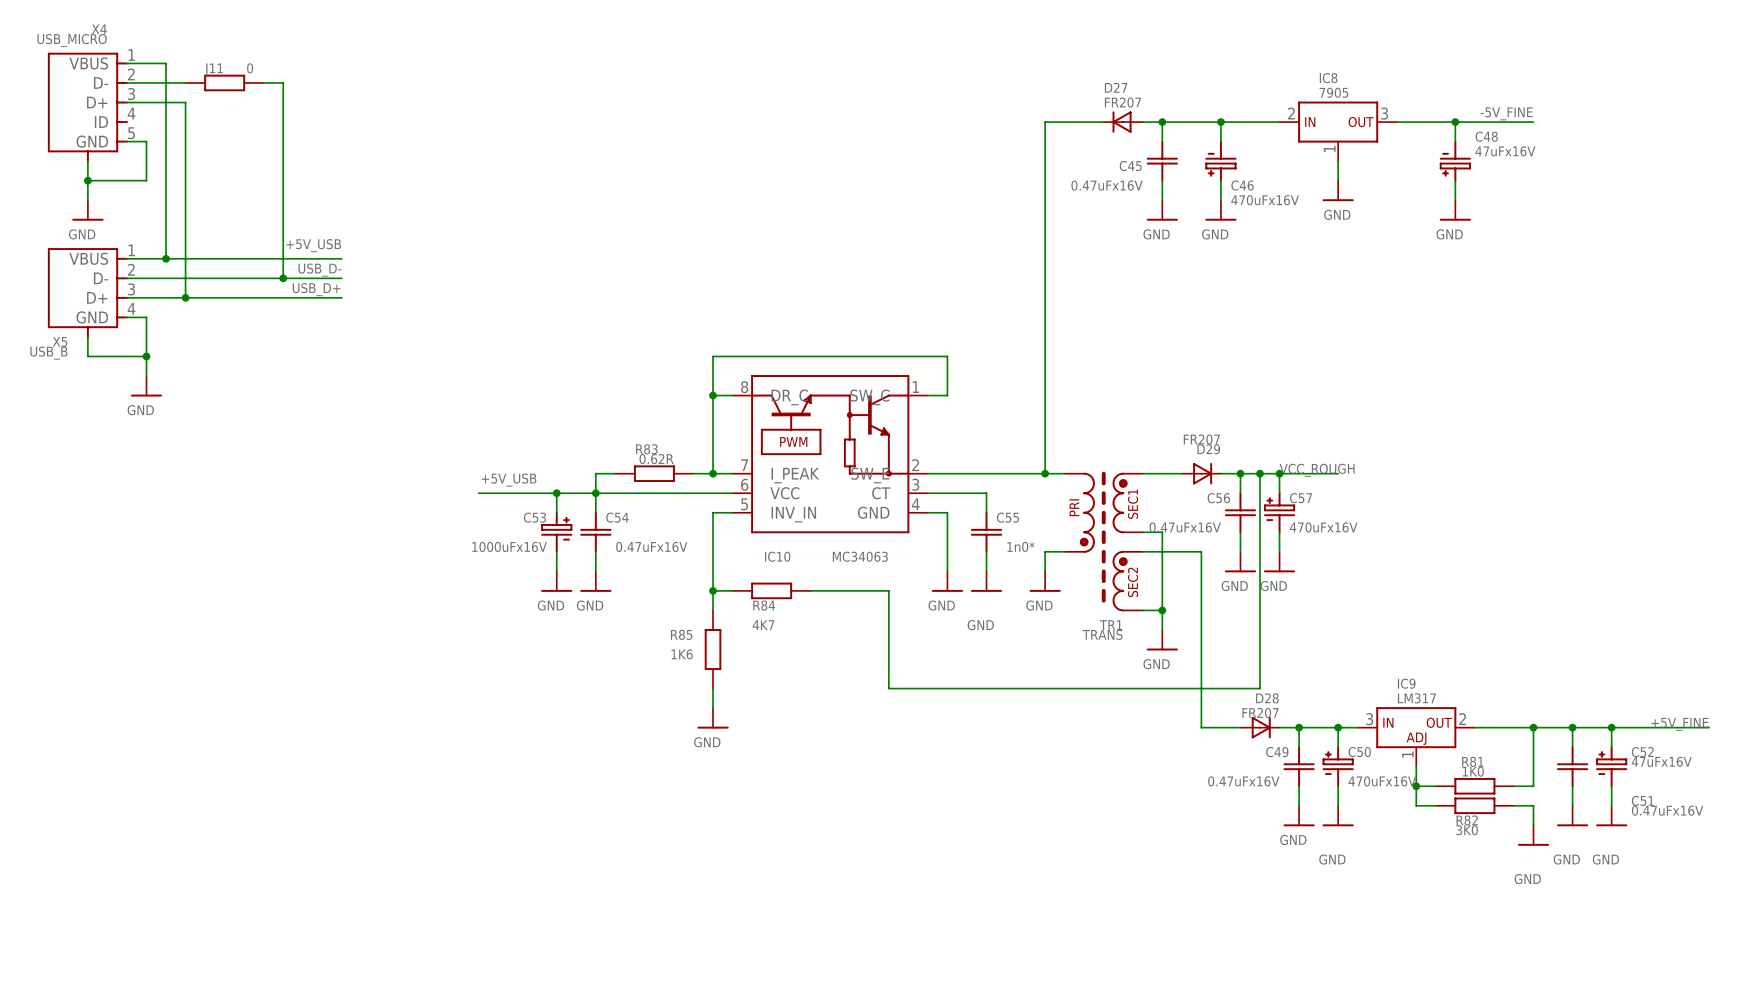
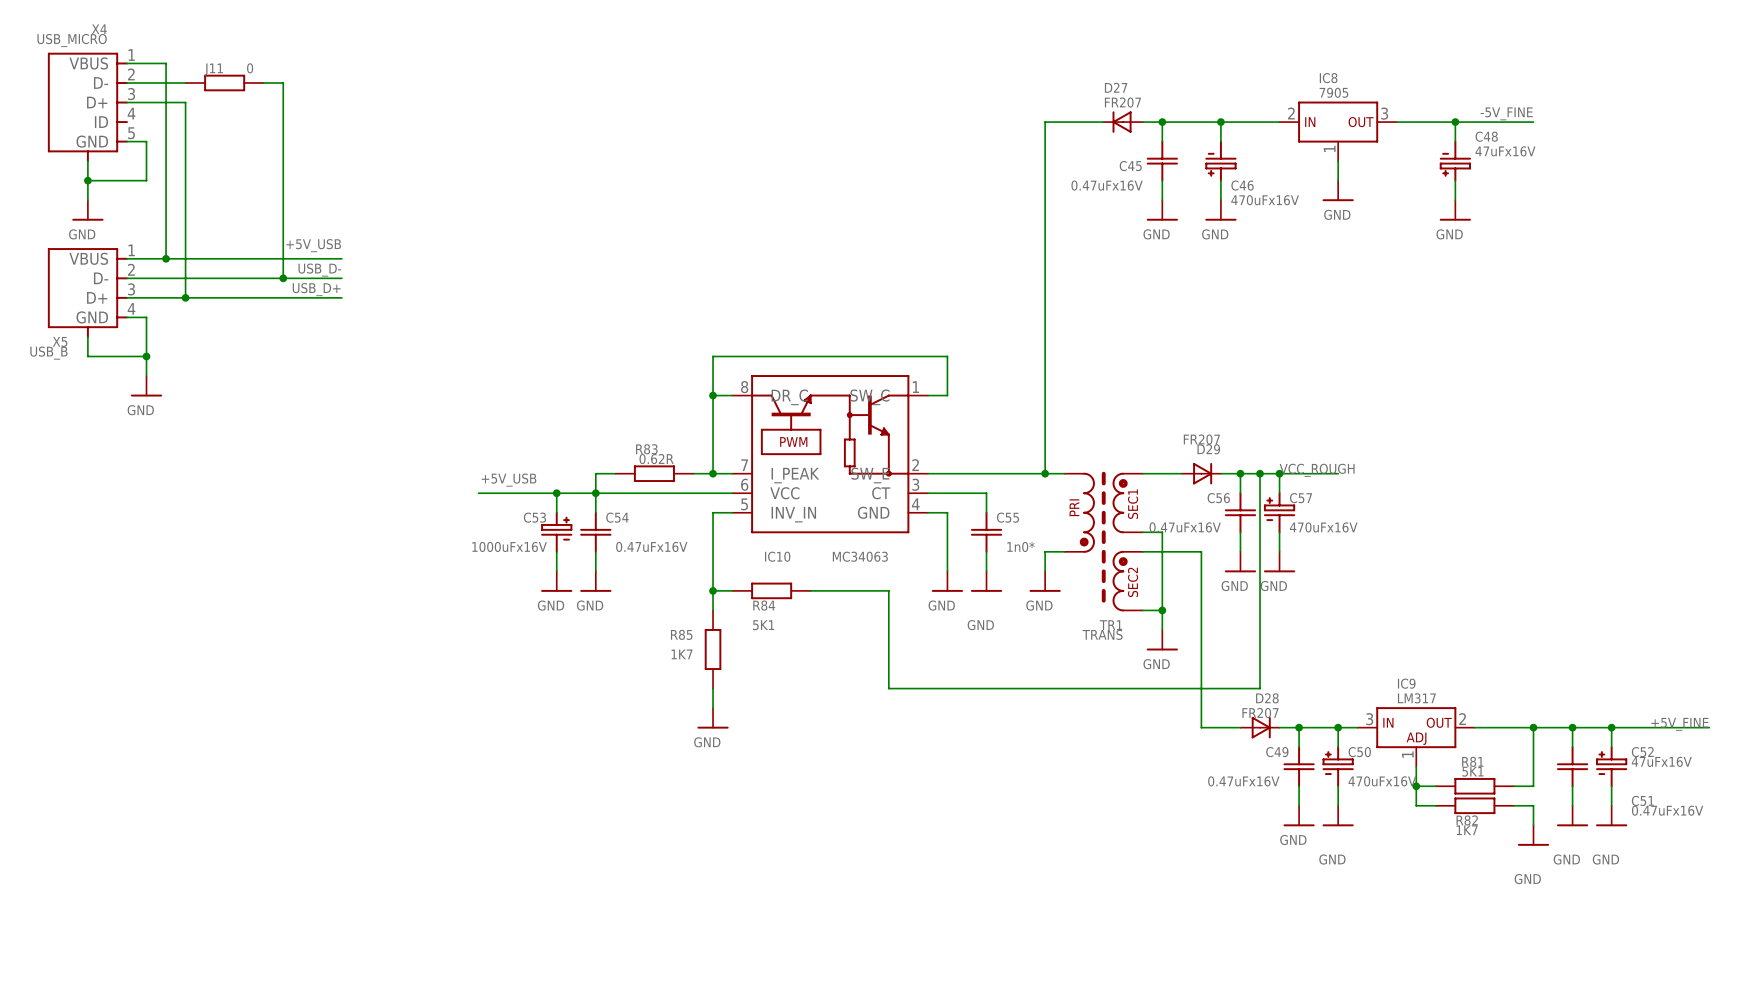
R84 value: 4K7 (763, 625) -> 5K1 (763, 625)
R85 value: 1K6 (682, 654) -> 1K7 (682, 654)
R81 value: 1K0 (1473, 771) -> 5K1 (1472, 771)
R82 value: 3K0 (1467, 830) -> 1K7 (1467, 830)

